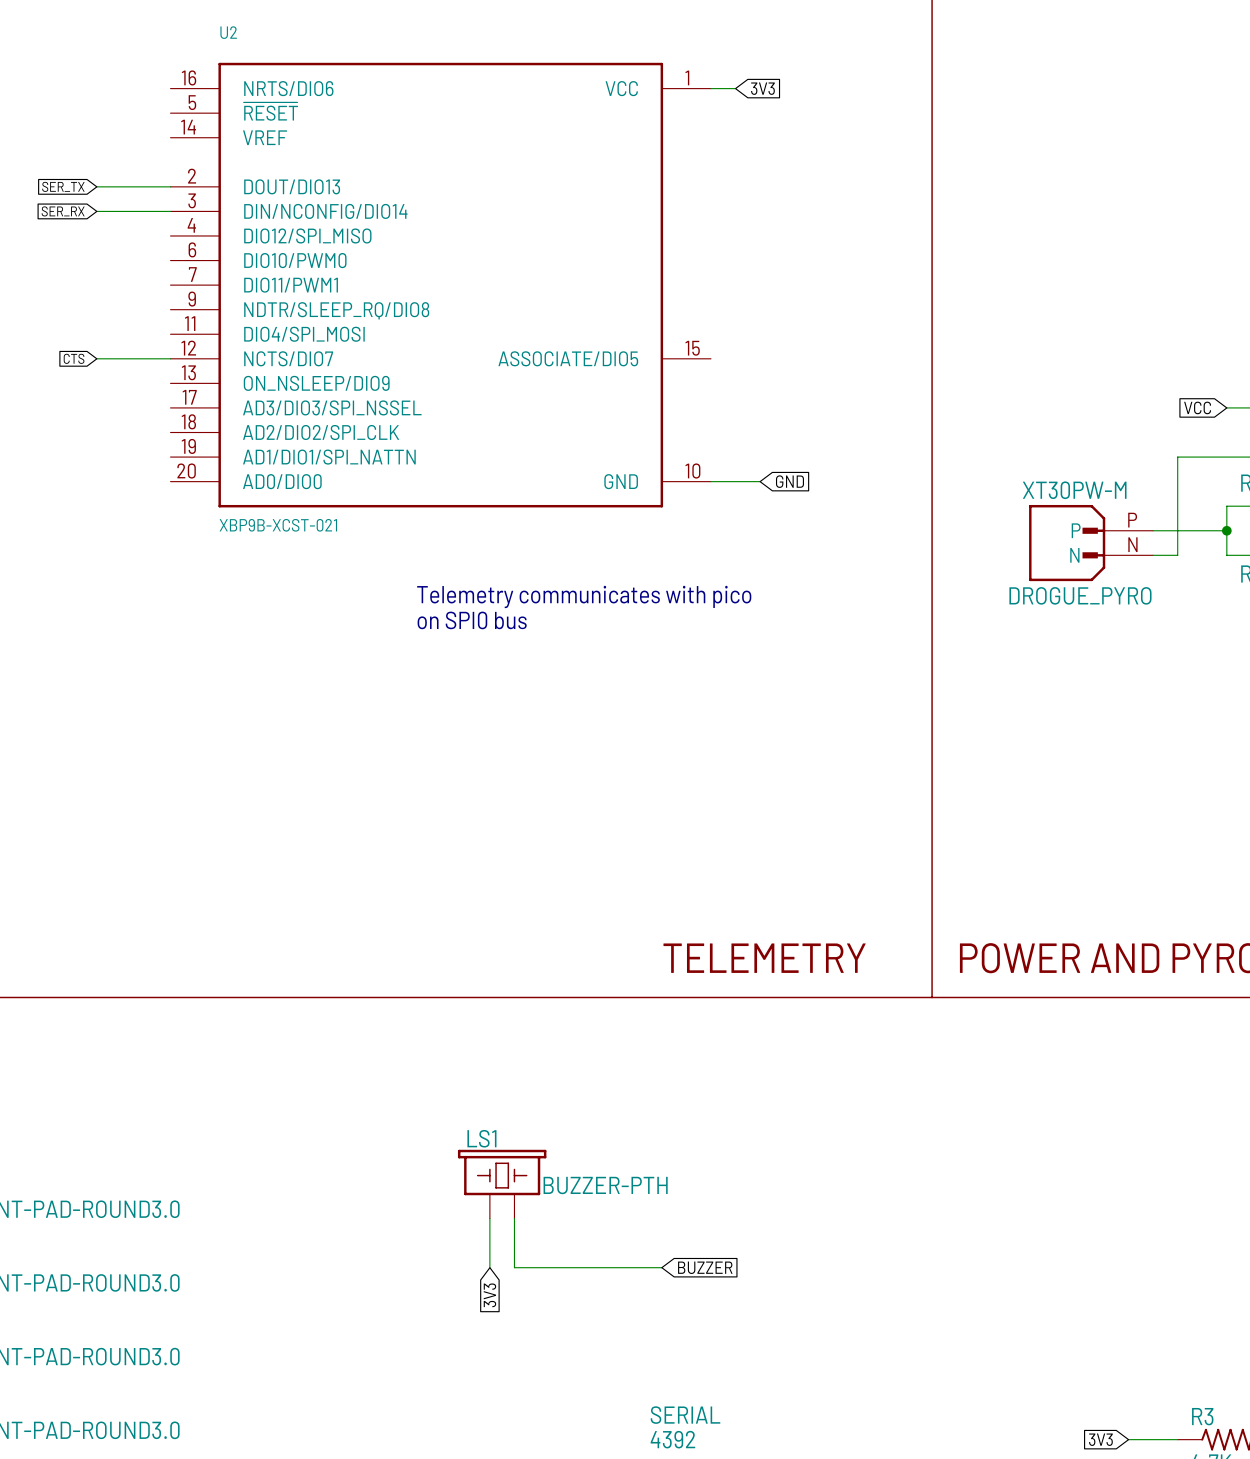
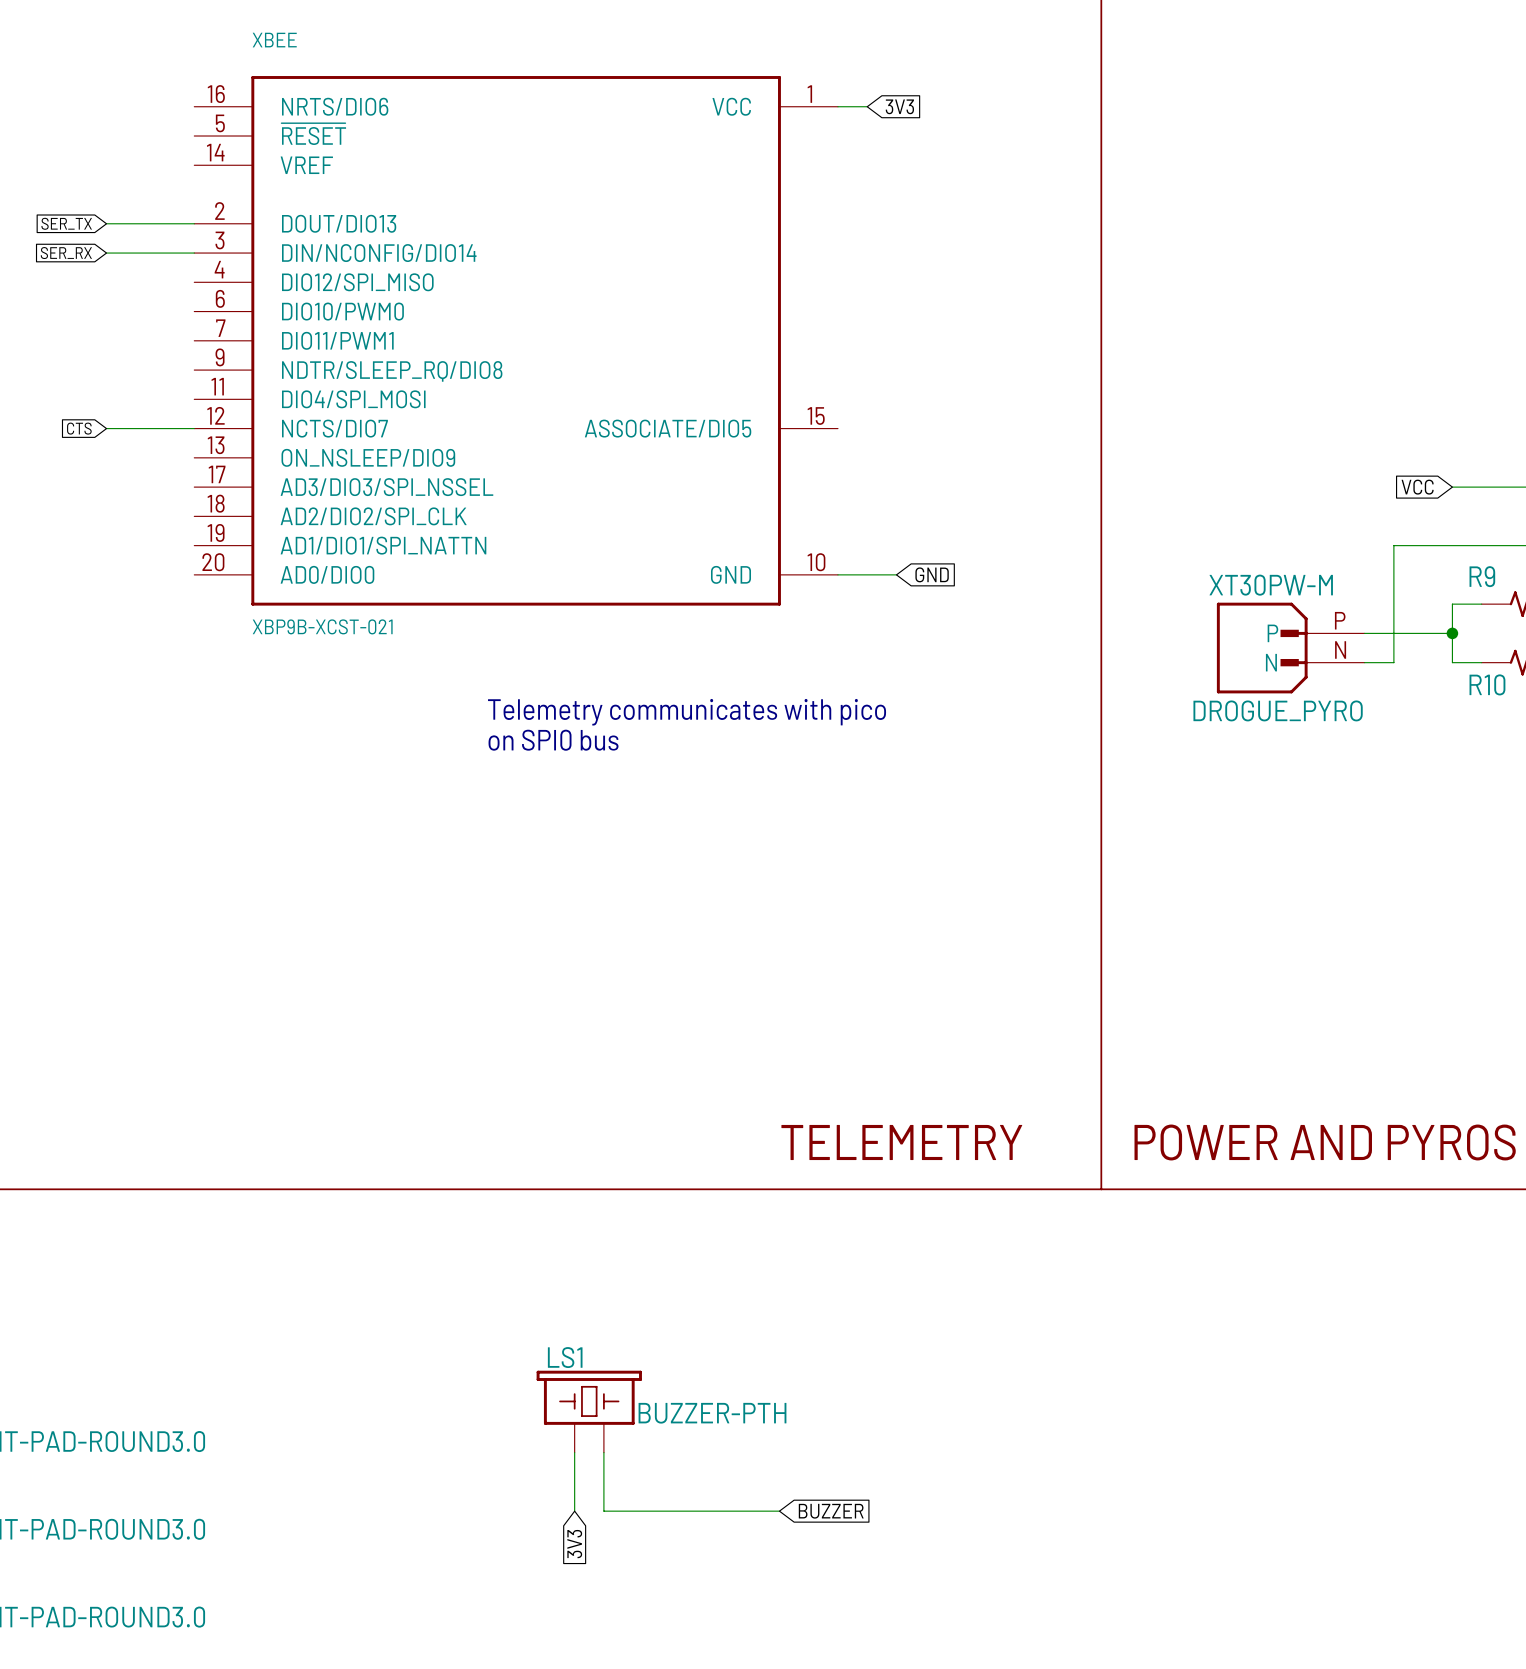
U2 name: U2 (228, 32) -> XBEE (274, 40)

